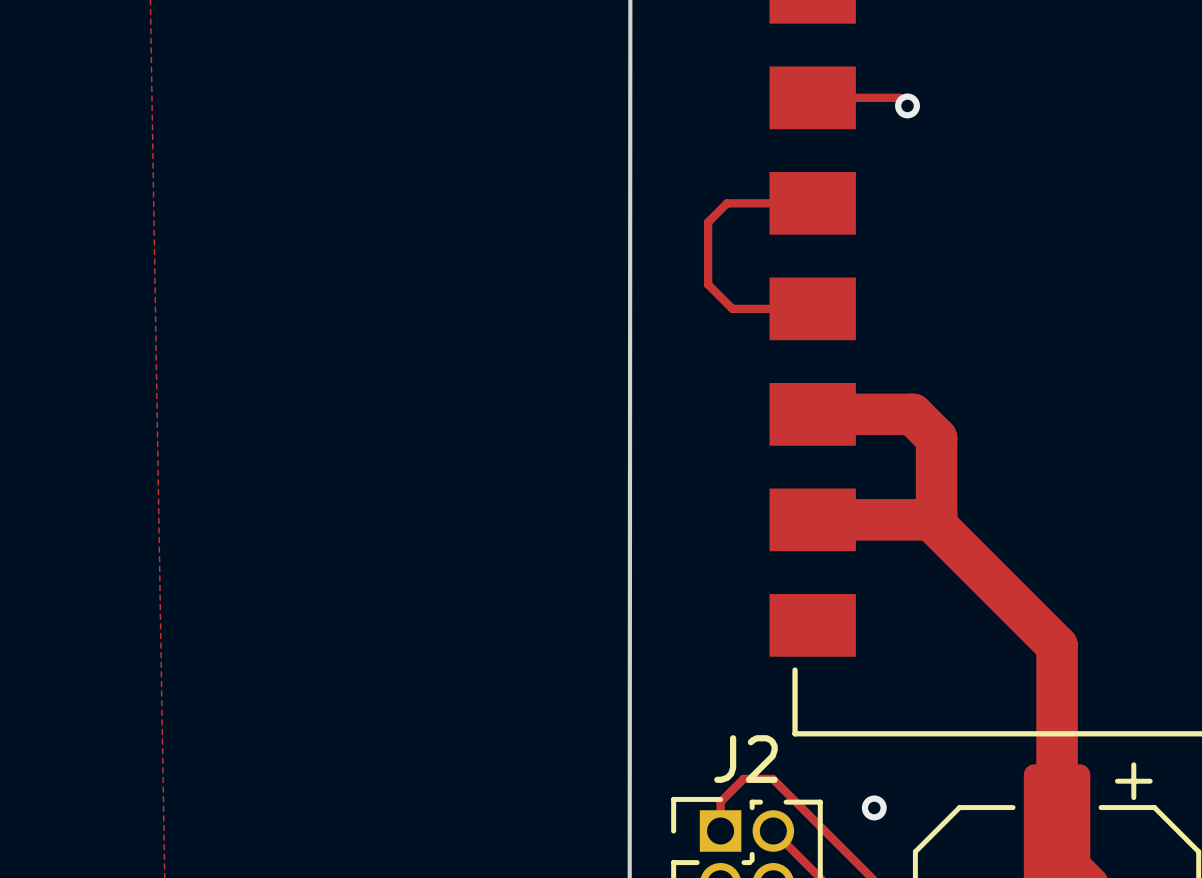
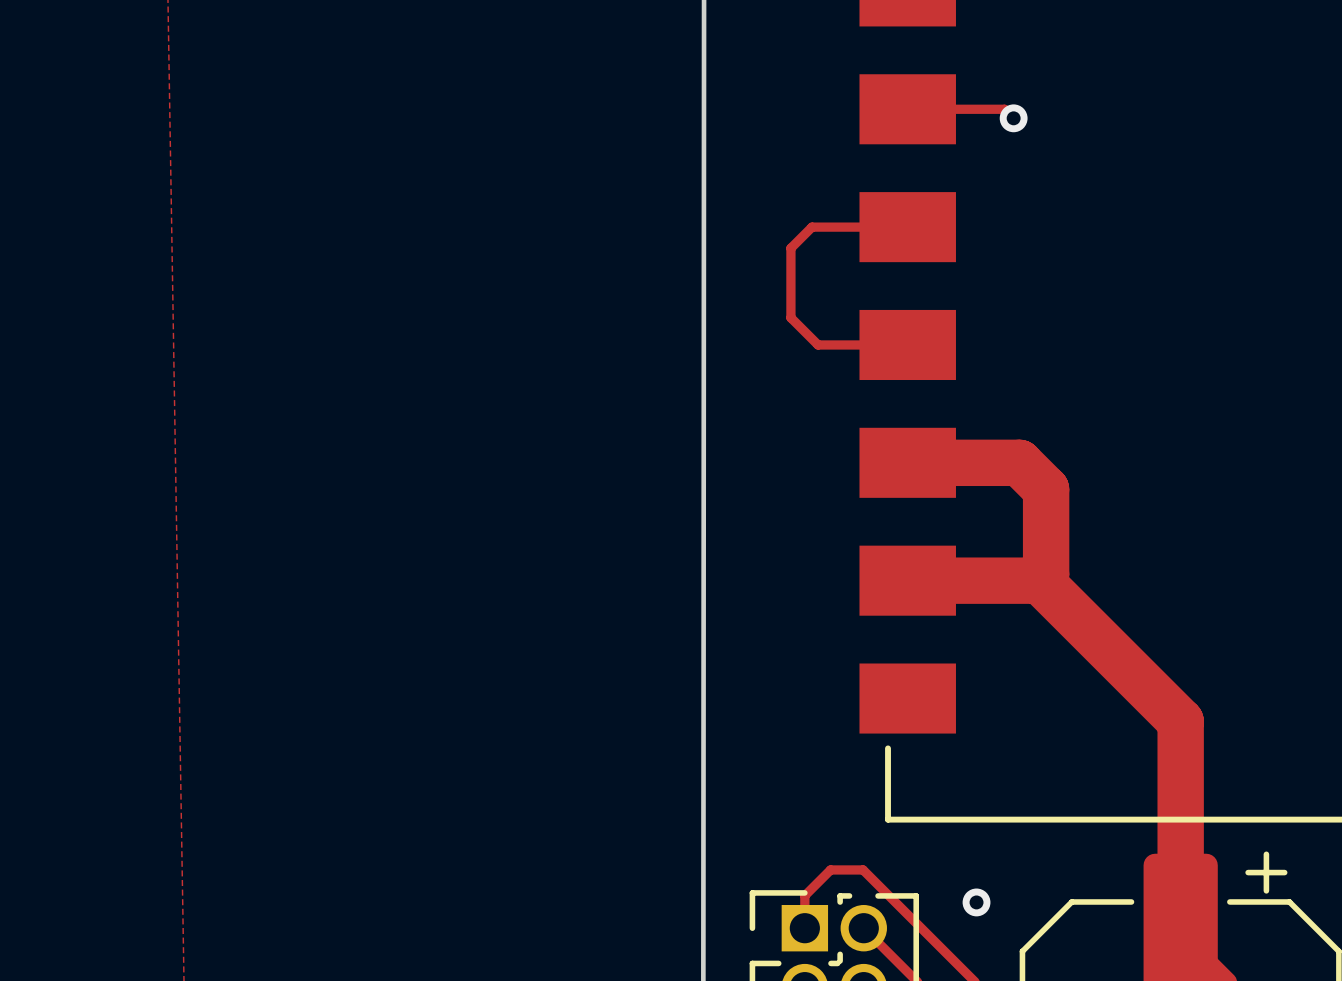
J2 name: J2 (745, 759) -> none

